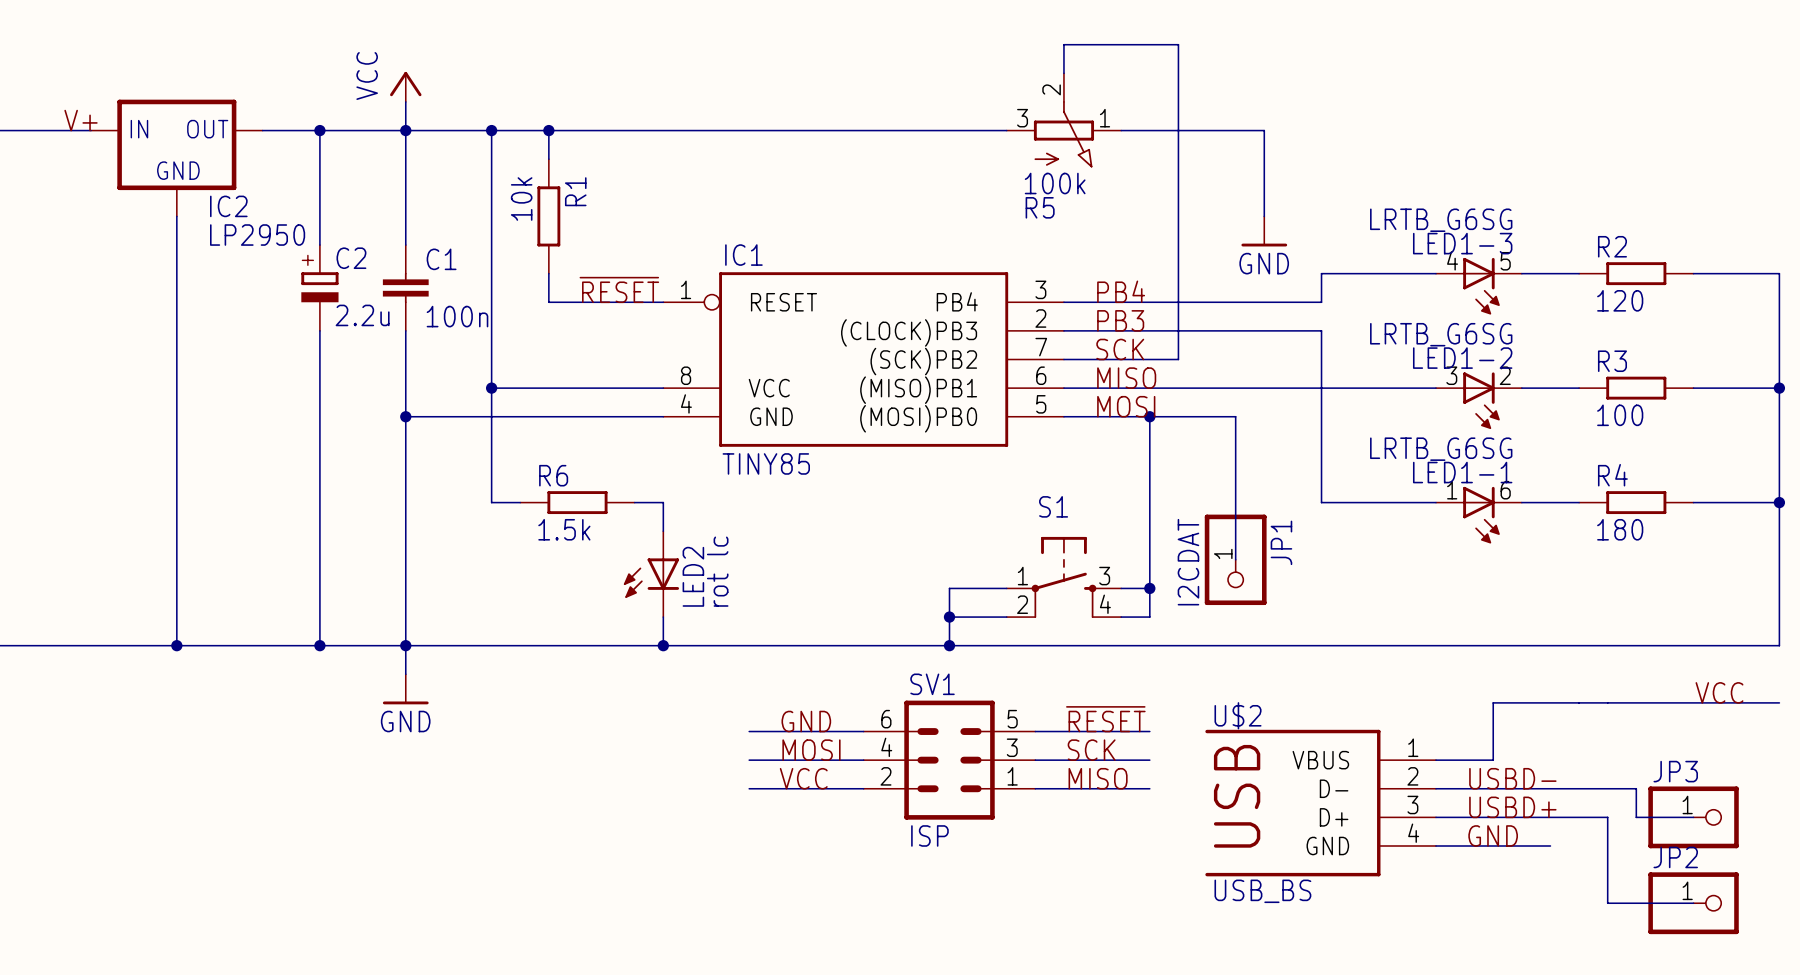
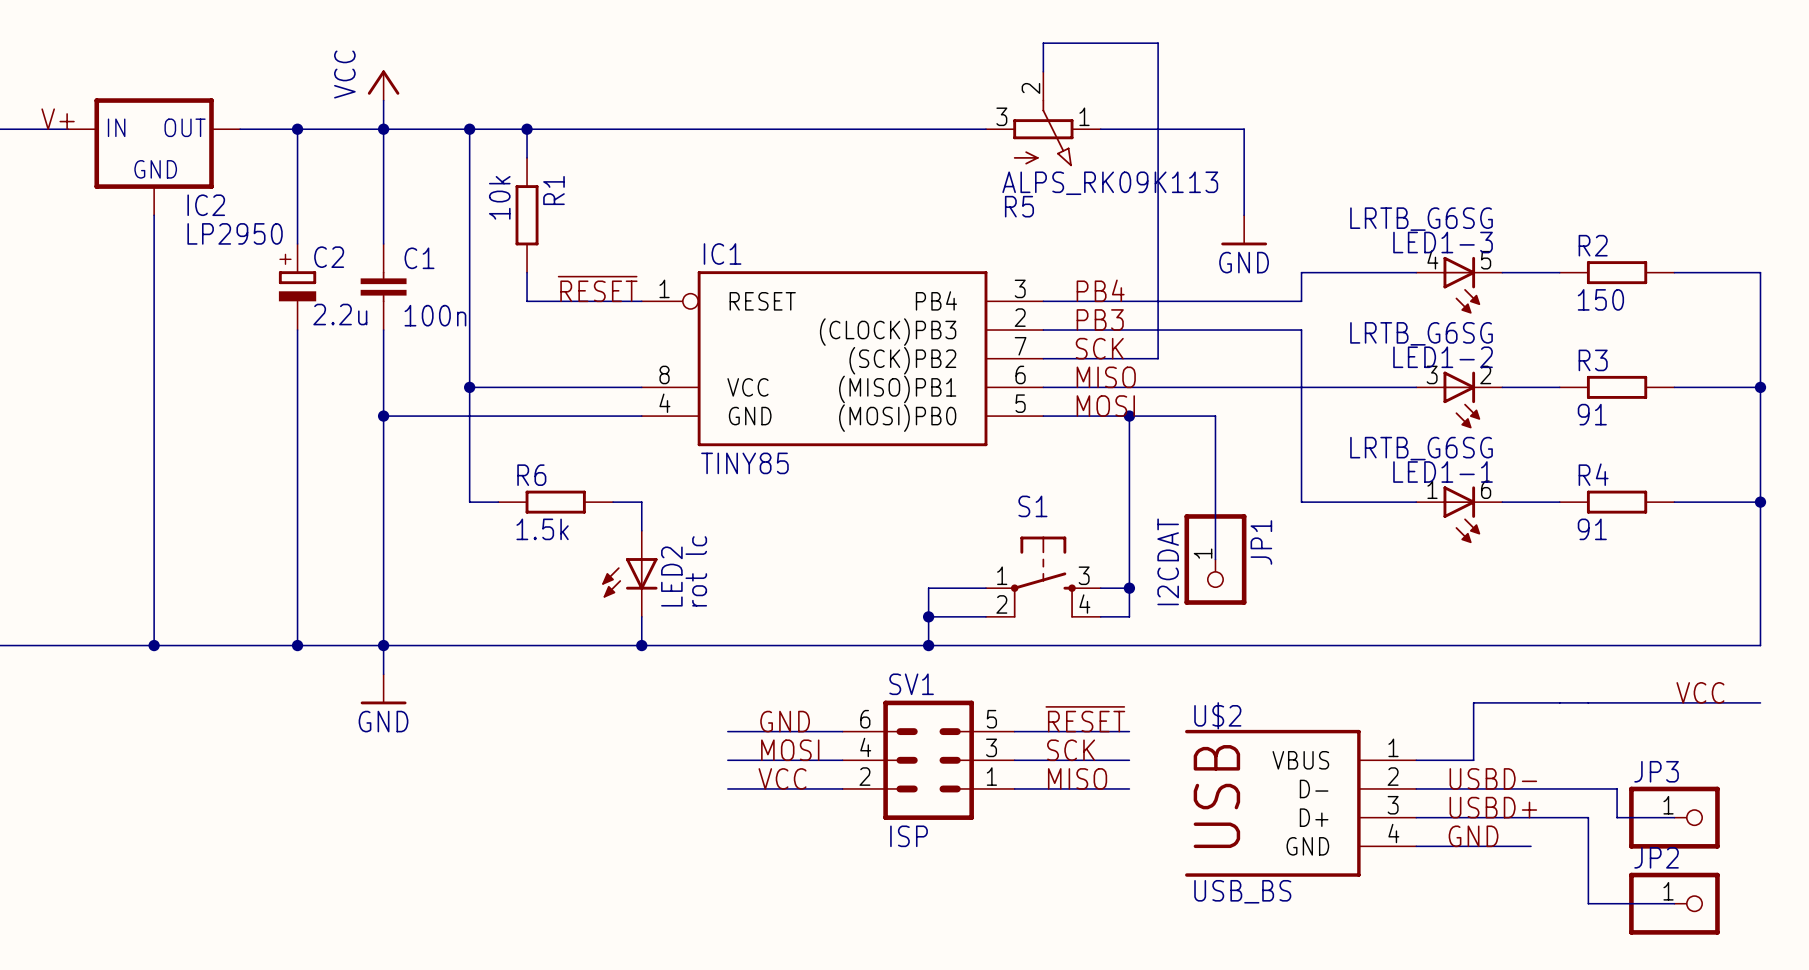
R5 value: 100k (1055, 183) -> ALPS_RK09K113 (1110, 183)
R2 value: 120 (1620, 300) -> 150 (1600, 299)
R3 value: 100 (1620, 415) -> 91 (1592, 414)
R4 value: 180 (1620, 529) -> 91 (1592, 529)

